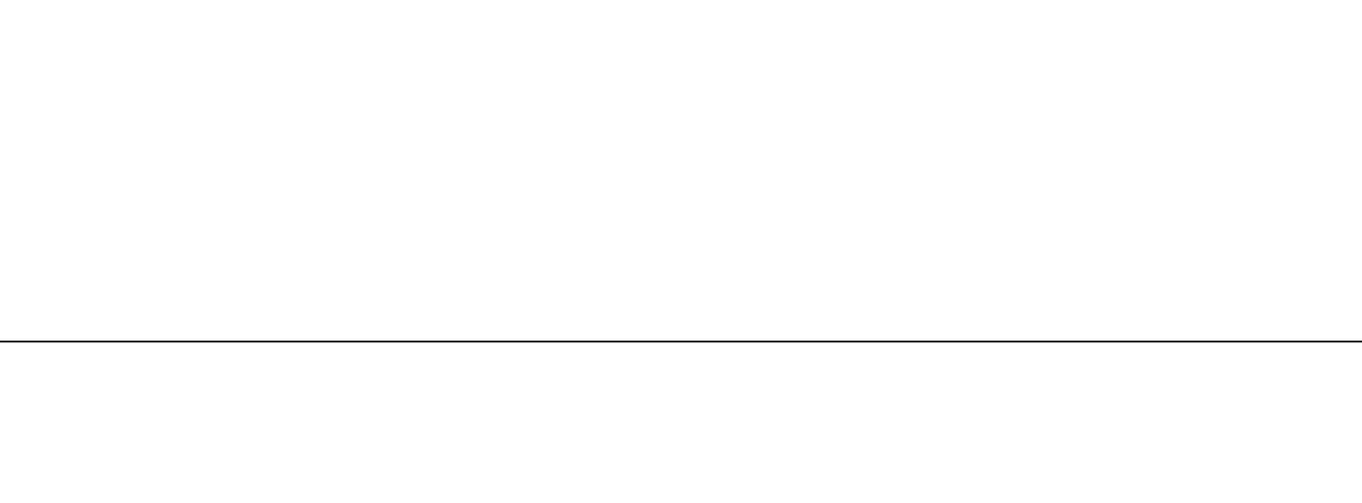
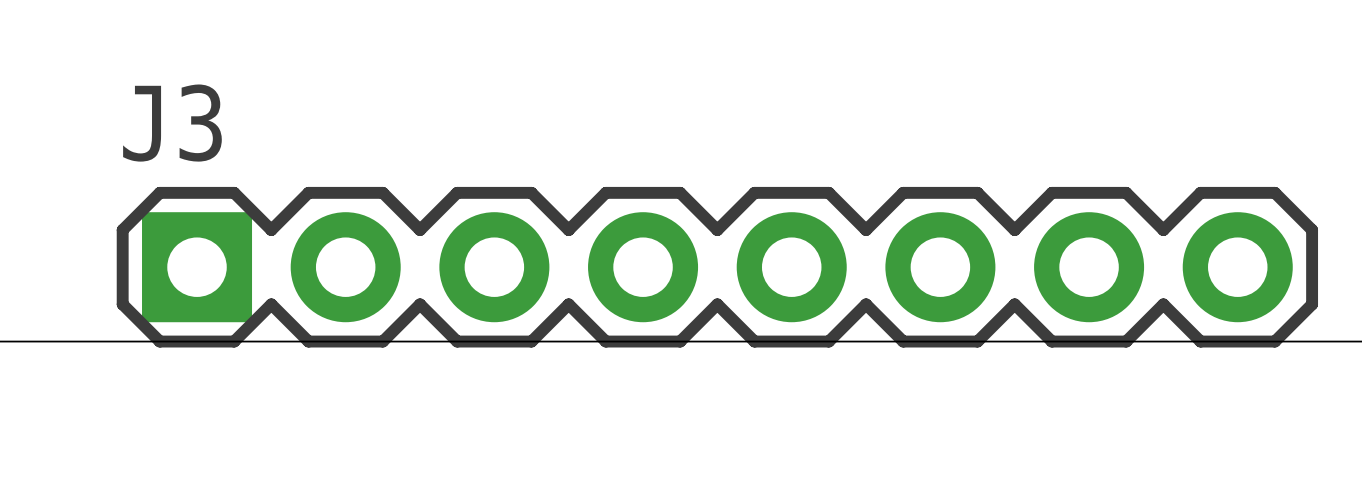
J3: none -> (717, 267)

